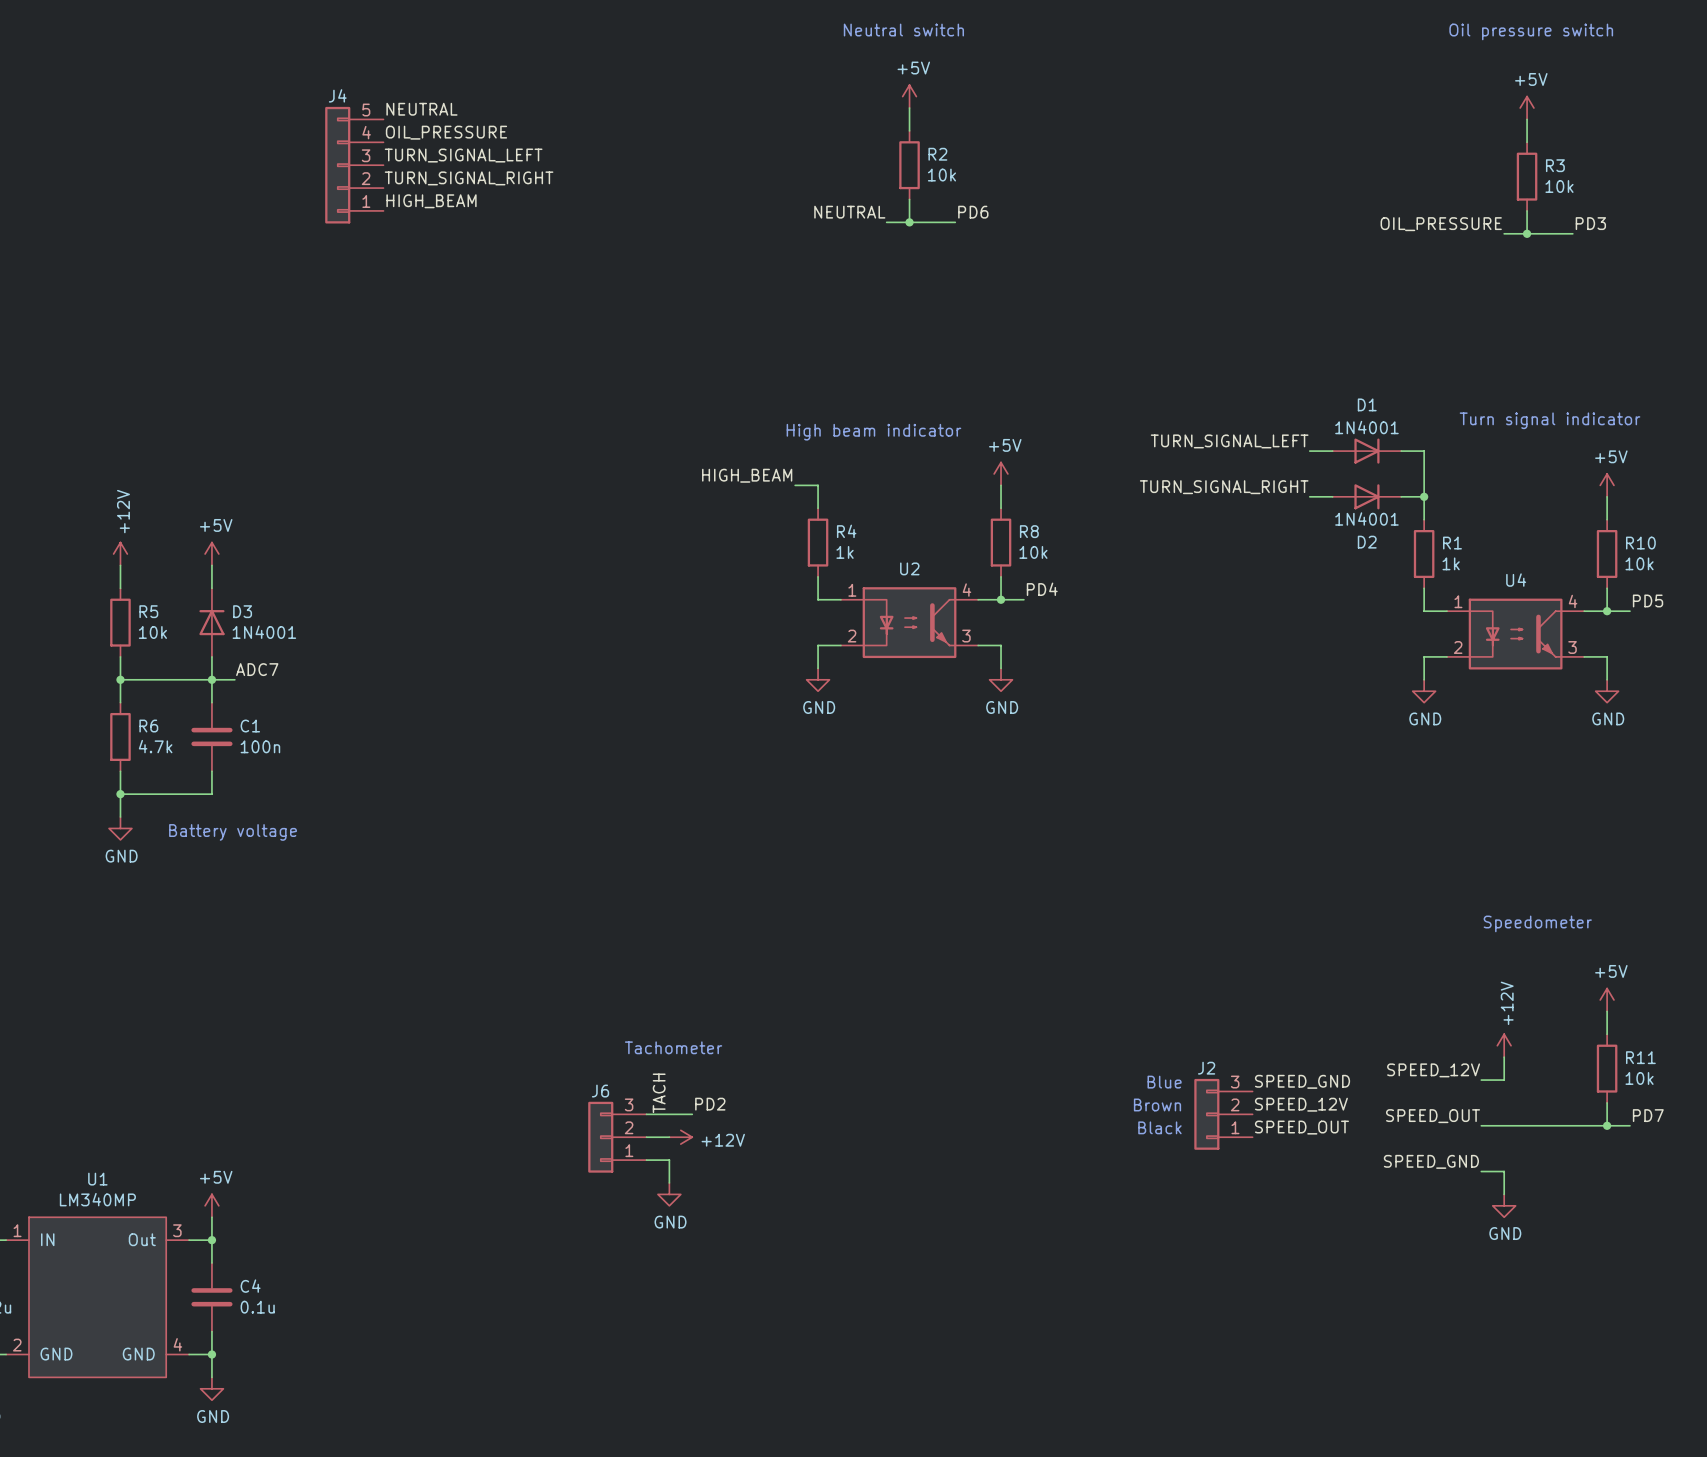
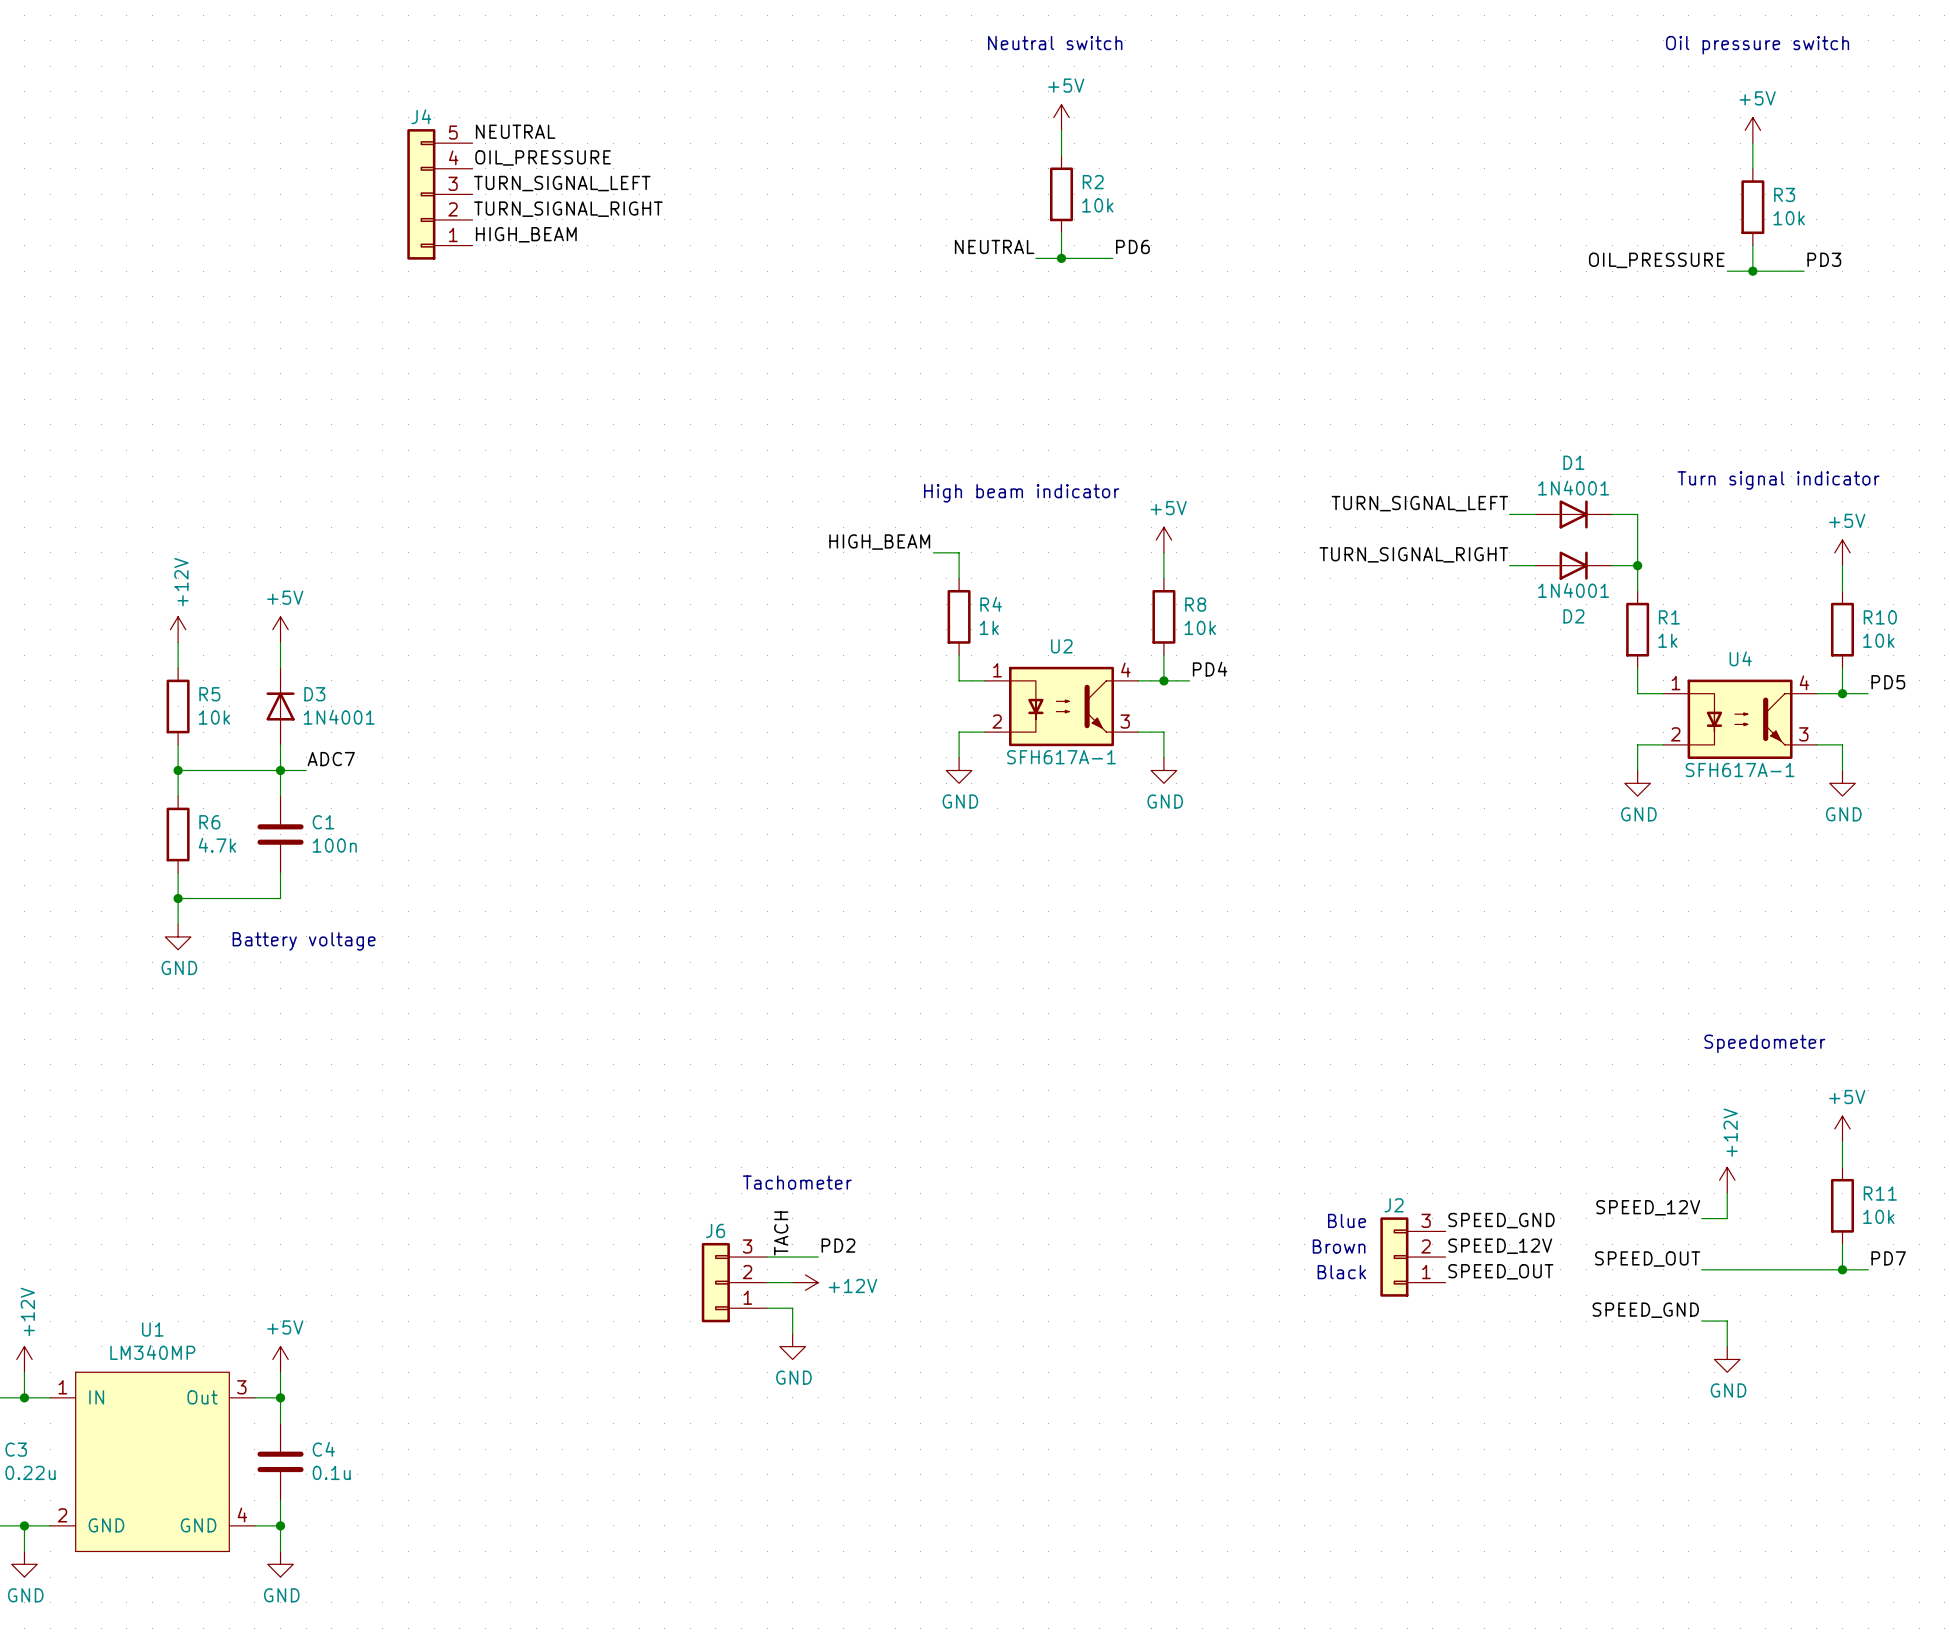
U2 value: none -> SFH617A-1 (1061, 757)
U4 value: none -> SFH617A-1 (1740, 770)

